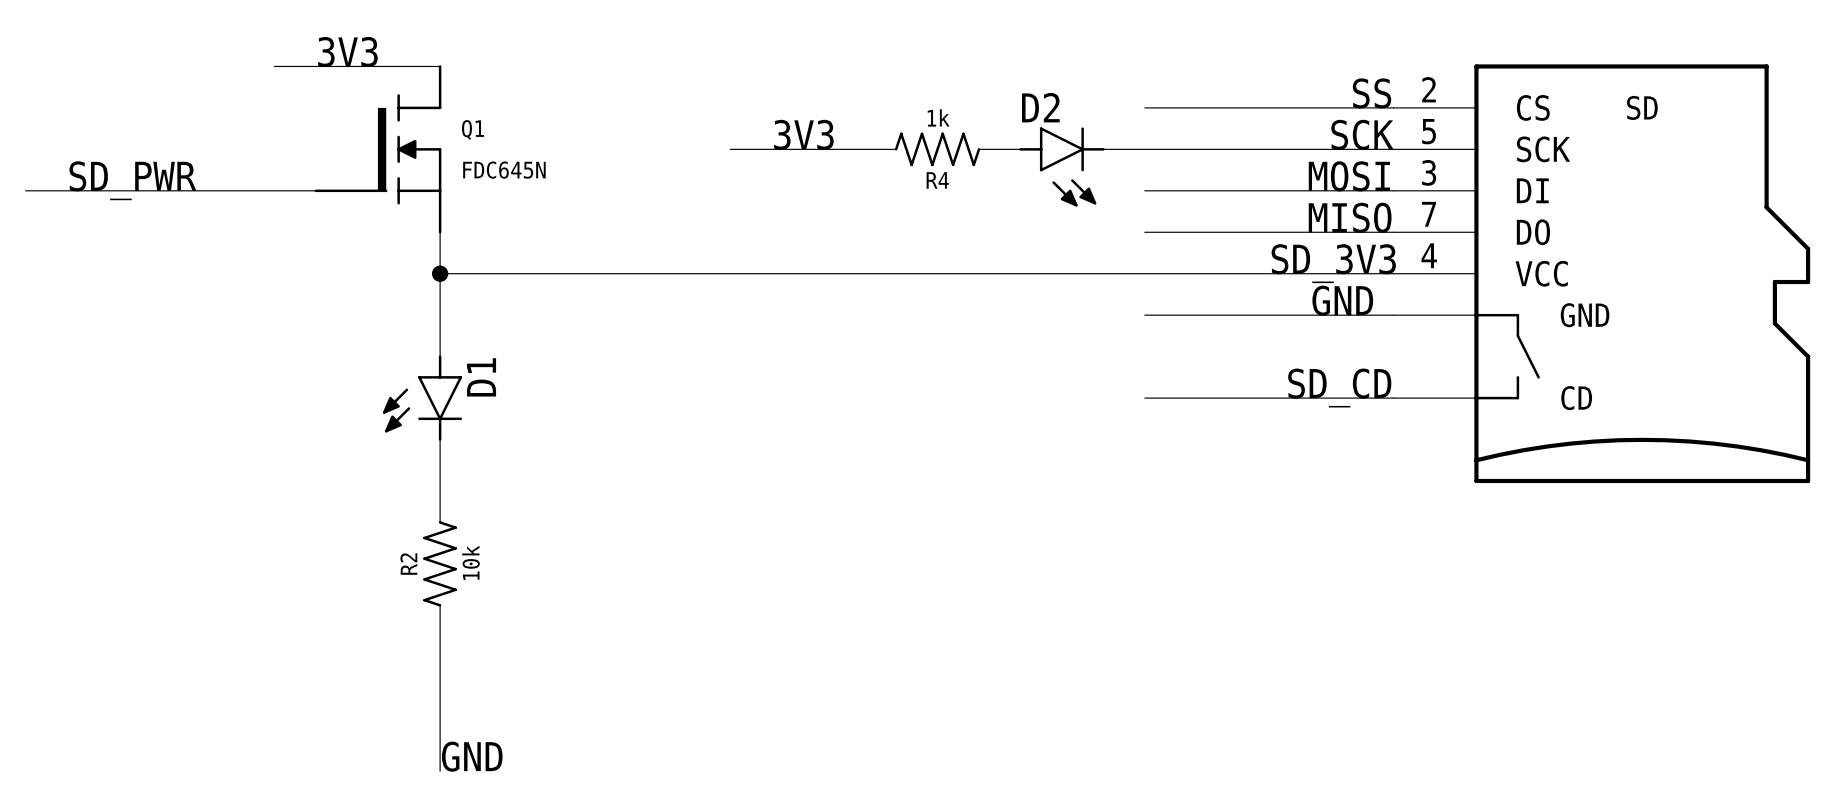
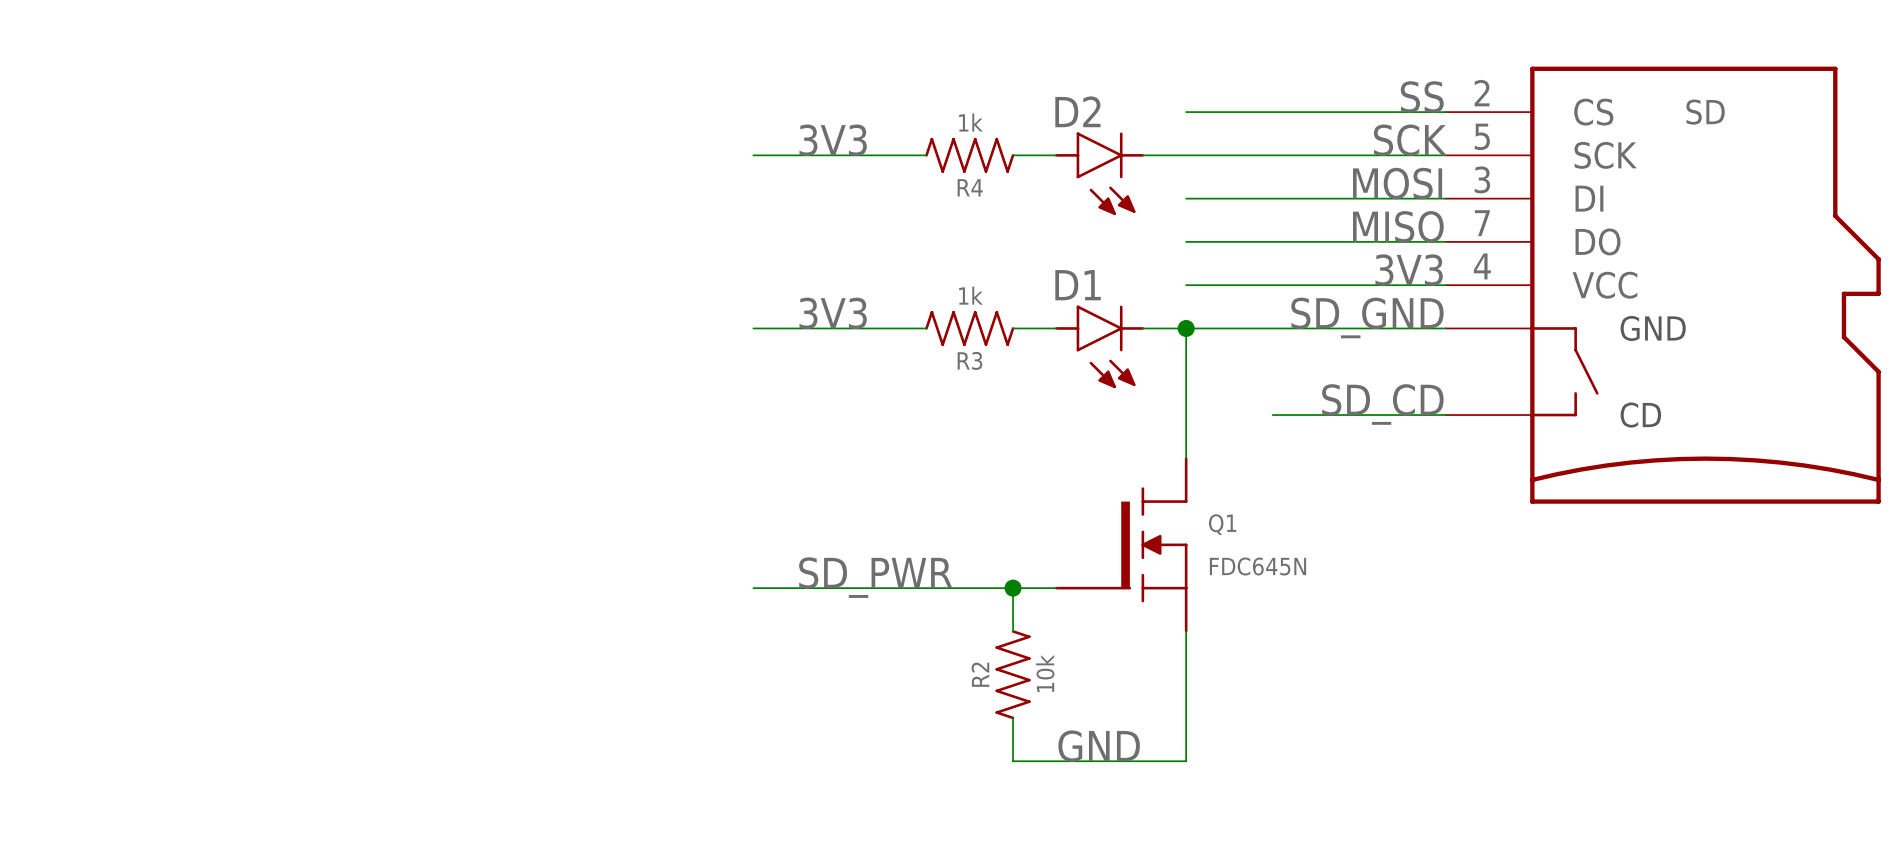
label: 3V3 (347, 51) -> none
wire: (274, 66) (440, 66) -> none
Q1 position: (377, 149) -> (1121, 544)
label: SD_PWR (132, 180) -> none
wire: (25, 190) (315, 190) -> none
wire: (440, 232) (440, 356) -> none
label: SD_3V3 (1333, 263) -> 3V3 (1409, 270)
wire: (440, 273) (1144, 273) -> none
junction: (440, 273) -> none
label: none -> 3V3 (833, 313)
label: GND (1342, 300) -> SD_GND (1367, 317)
wire: none -> (753, 328) (926, 328)
R3: none -> 1k (969, 328)
wire: none -> (1013, 328) (1056, 328)
wire: none -> (1142, 328) (1186, 328) (1186, 458)
junction: none -> (1186, 328)
D1 rotation: 0° (422, 398) -> 90° counterclockwise (1099, 346)
D1 position: (422, 398) -> (1099, 346)
wire: (1144, 398) (1227, 398) -> none
wire: (440, 439) (440, 522) -> none
label: none -> SD_PWR (875, 577)
R2 position: (440, 563) -> (1013, 674)
wire: none -> (753, 588) (1056, 588)
wire: none -> (1013, 588) (1013, 631)
junction: none -> (1013, 588)
wire: (440, 605) (440, 771) -> none
wire: none -> (1186, 631) (1186, 761) (1013, 761) (1013, 717)
label: none -> GND (1099, 746)
label: GND (472, 756) -> none

